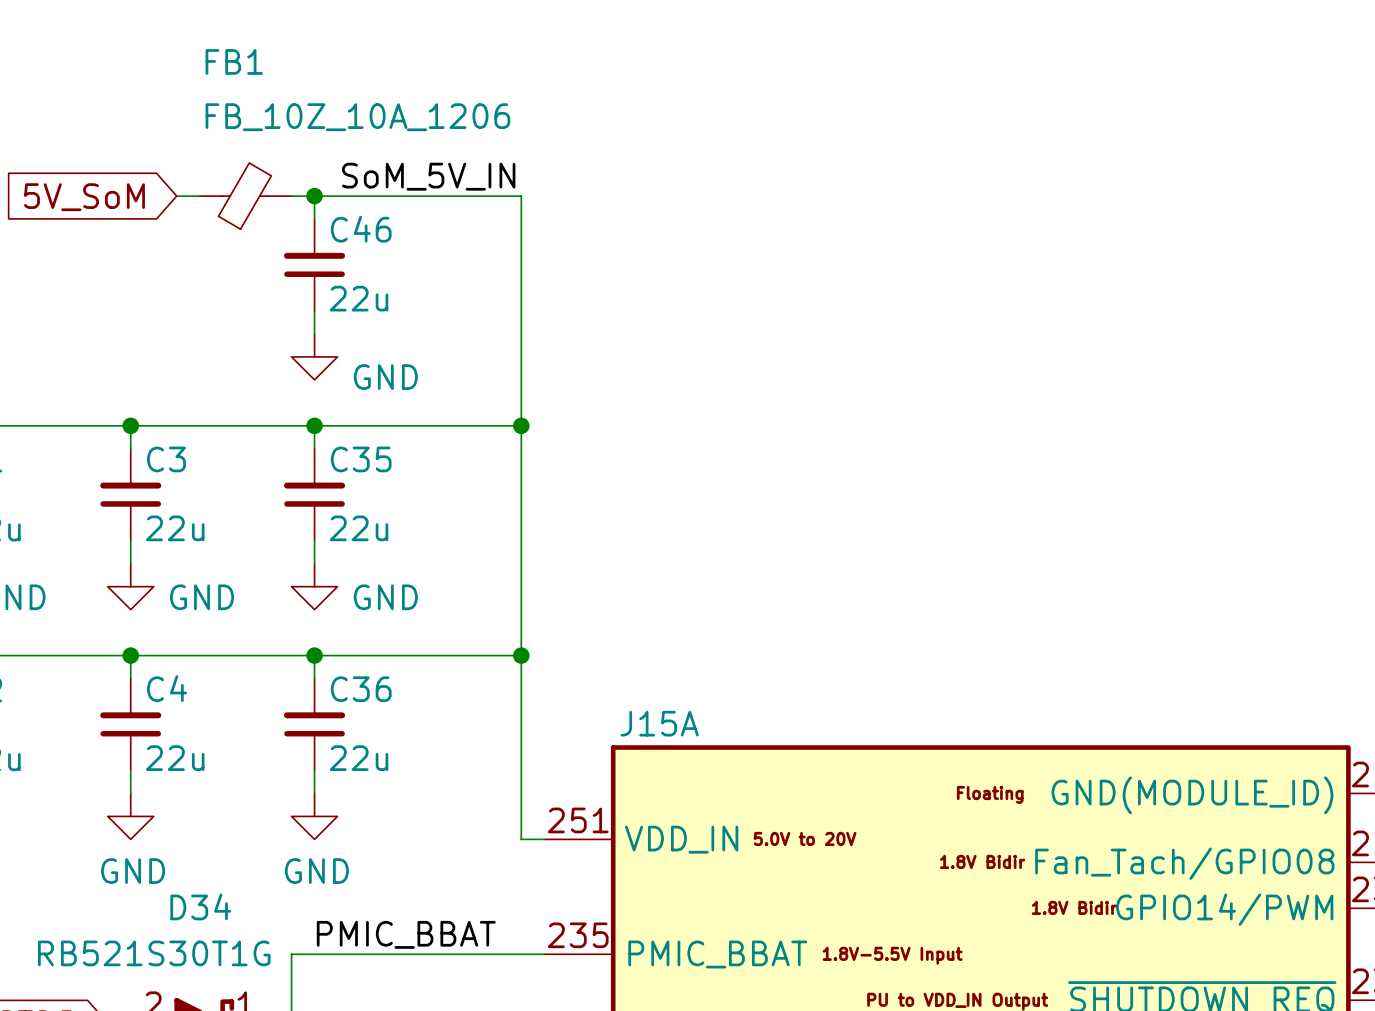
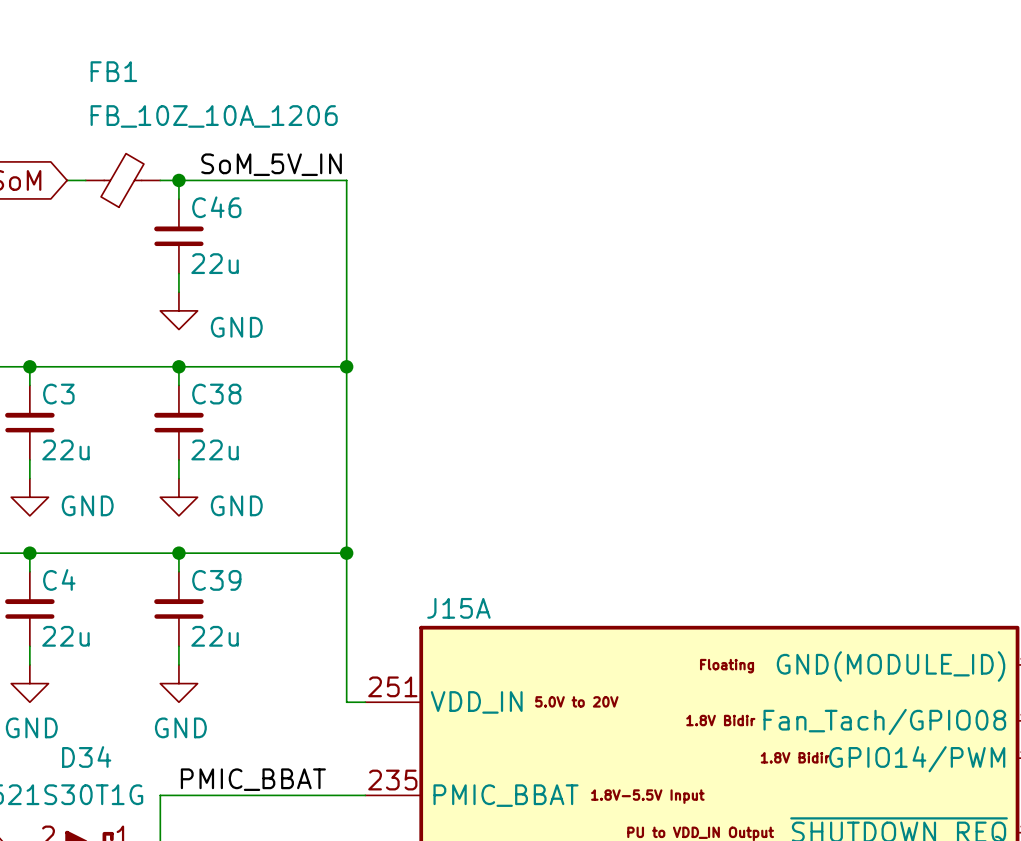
C35 name: C35 (361, 459) -> C38 (216, 394)
C36 name: C36 (361, 689) -> C39 (216, 580)

